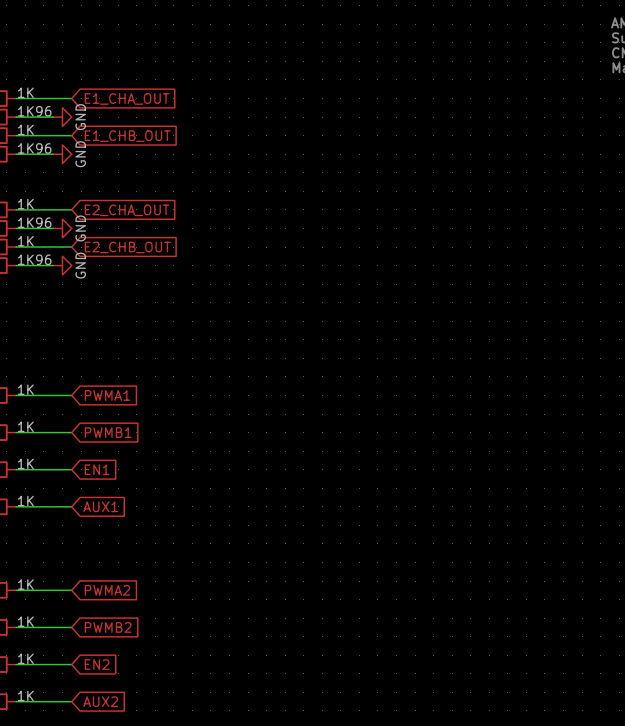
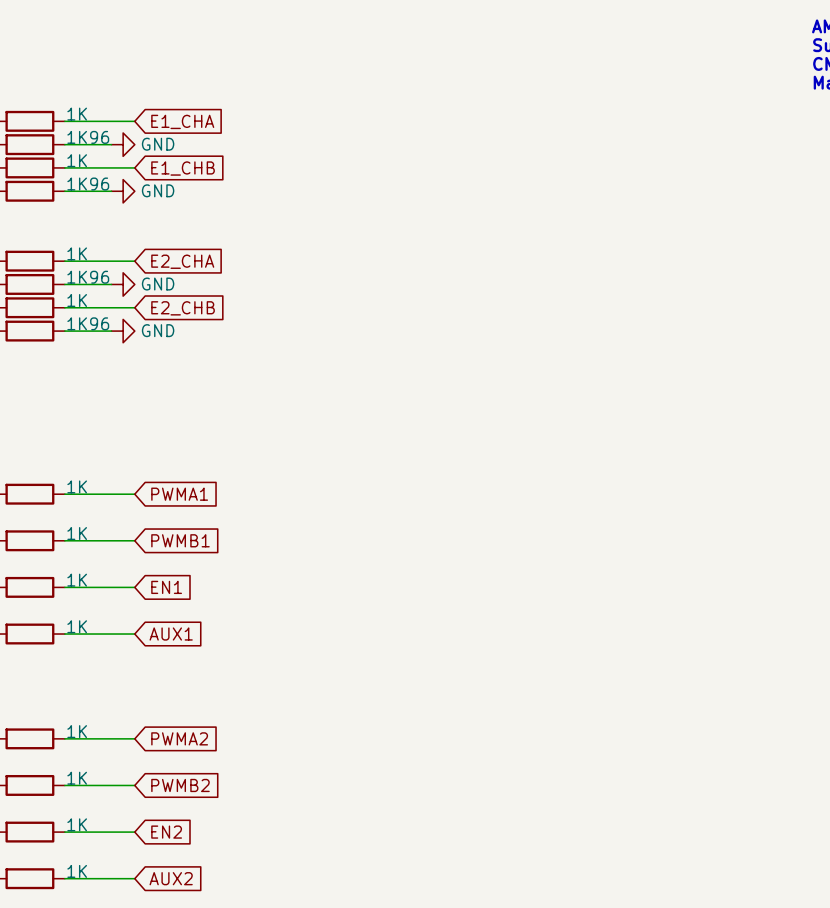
global label: E1_CHA_OUT (127, 98) -> E1_CHA (182, 121)
power symbol text rotation: 0° (80, 117) -> 90° clockwise (158, 144)
global label: E1_CHB_OUT (127, 136) -> E1_CHB (183, 168)
power symbol text rotation: 0° (80, 154) -> 90° clockwise (158, 190)
global label: E2_CHA_OUT (127, 210) -> E2_CHA (182, 261)
power symbol text rotation: 0° (80, 228) -> 90° clockwise (158, 284)
global label: E2_CHB_OUT (127, 247) -> E2_CHB (183, 308)
power symbol text rotation: 0° (80, 265) -> 90° clockwise (158, 330)

